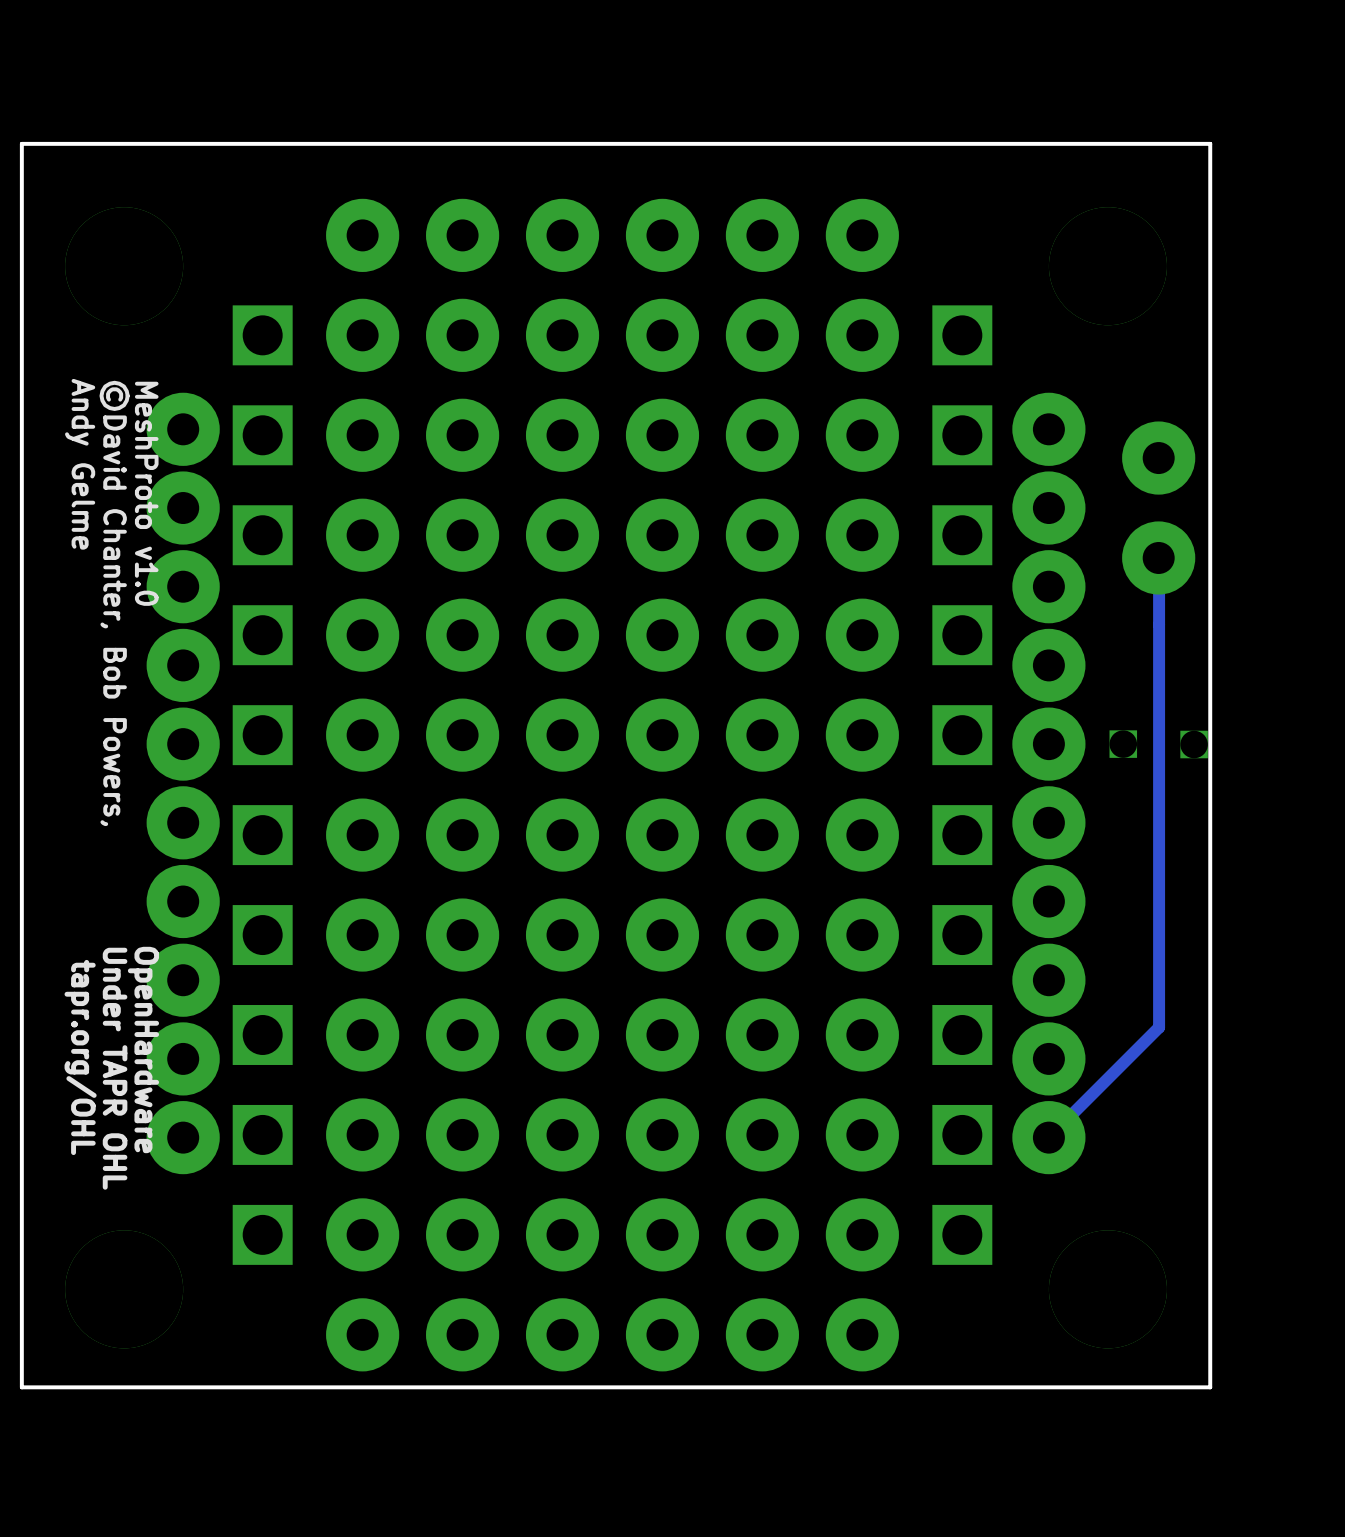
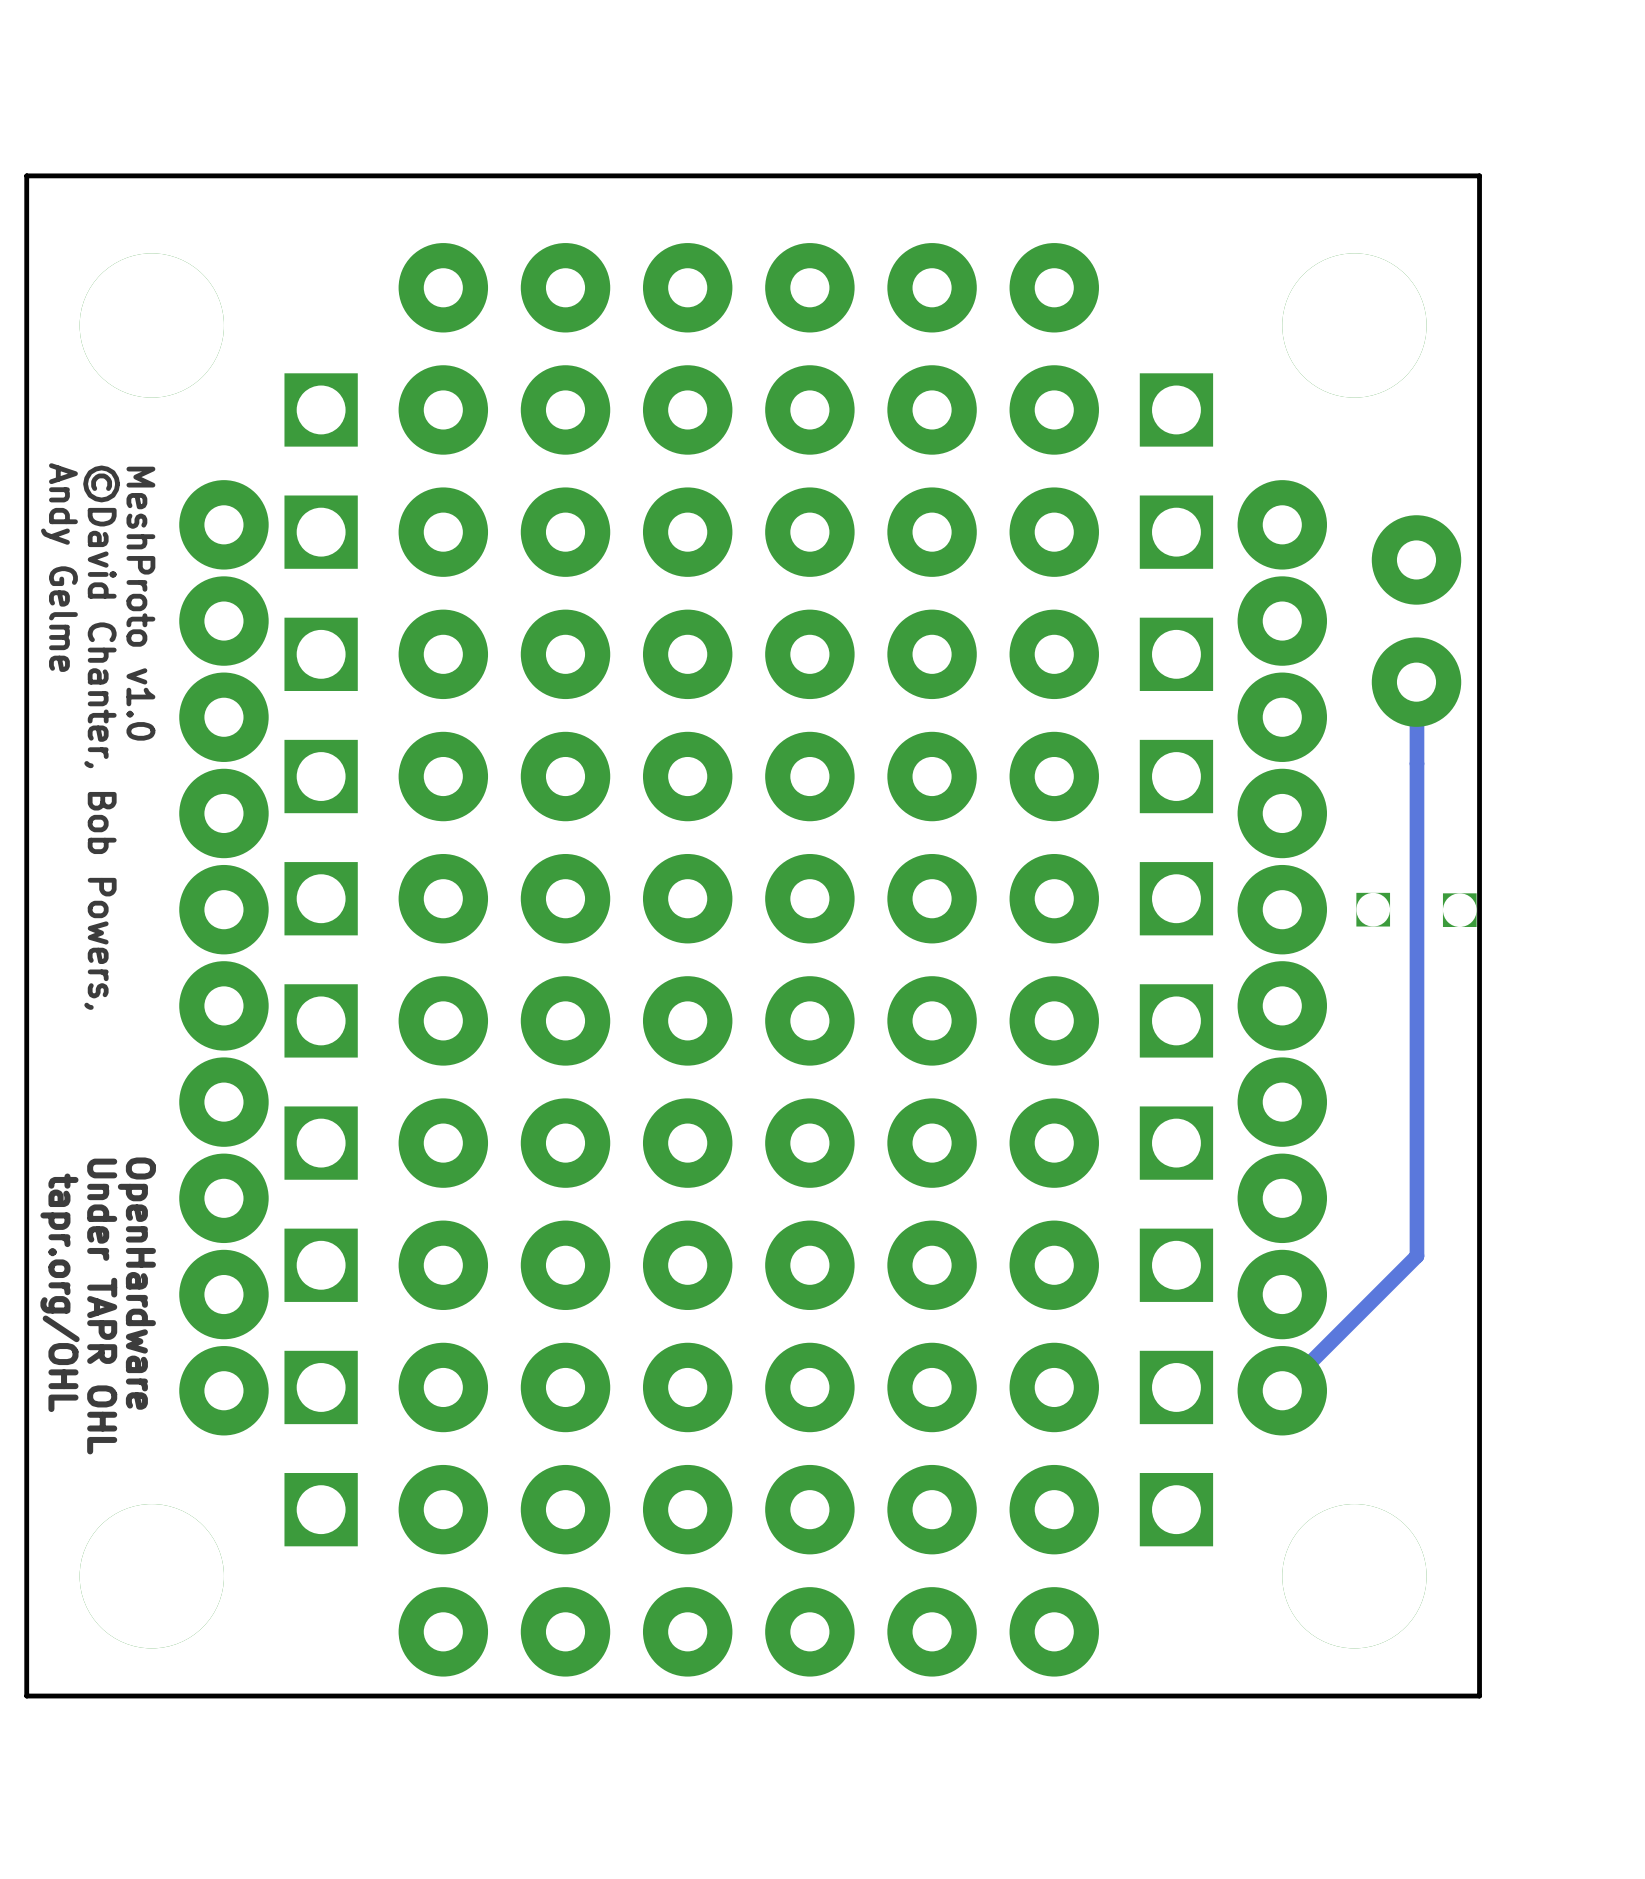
text position: Andy Gelme (80, 464) -> Andy Gelme (59, 567)
text position: MeshProto v1.0 (146, 493) -> MeshProto v1.0 (140, 603)
text position: ©David Chanter, Bob Powers, (114, 603) -> ©David Chanter, Bob Powers, (101, 737)
text position: OpenHardware (143, 1049) -> OpenHardware (136, 1283)
text position: tapr.org/OHL (80, 1057) -> tapr.org/OHL (60, 1292)
text position: Under TAPR OHL (115, 1068) -> Under TAPR OHL (102, 1306)

